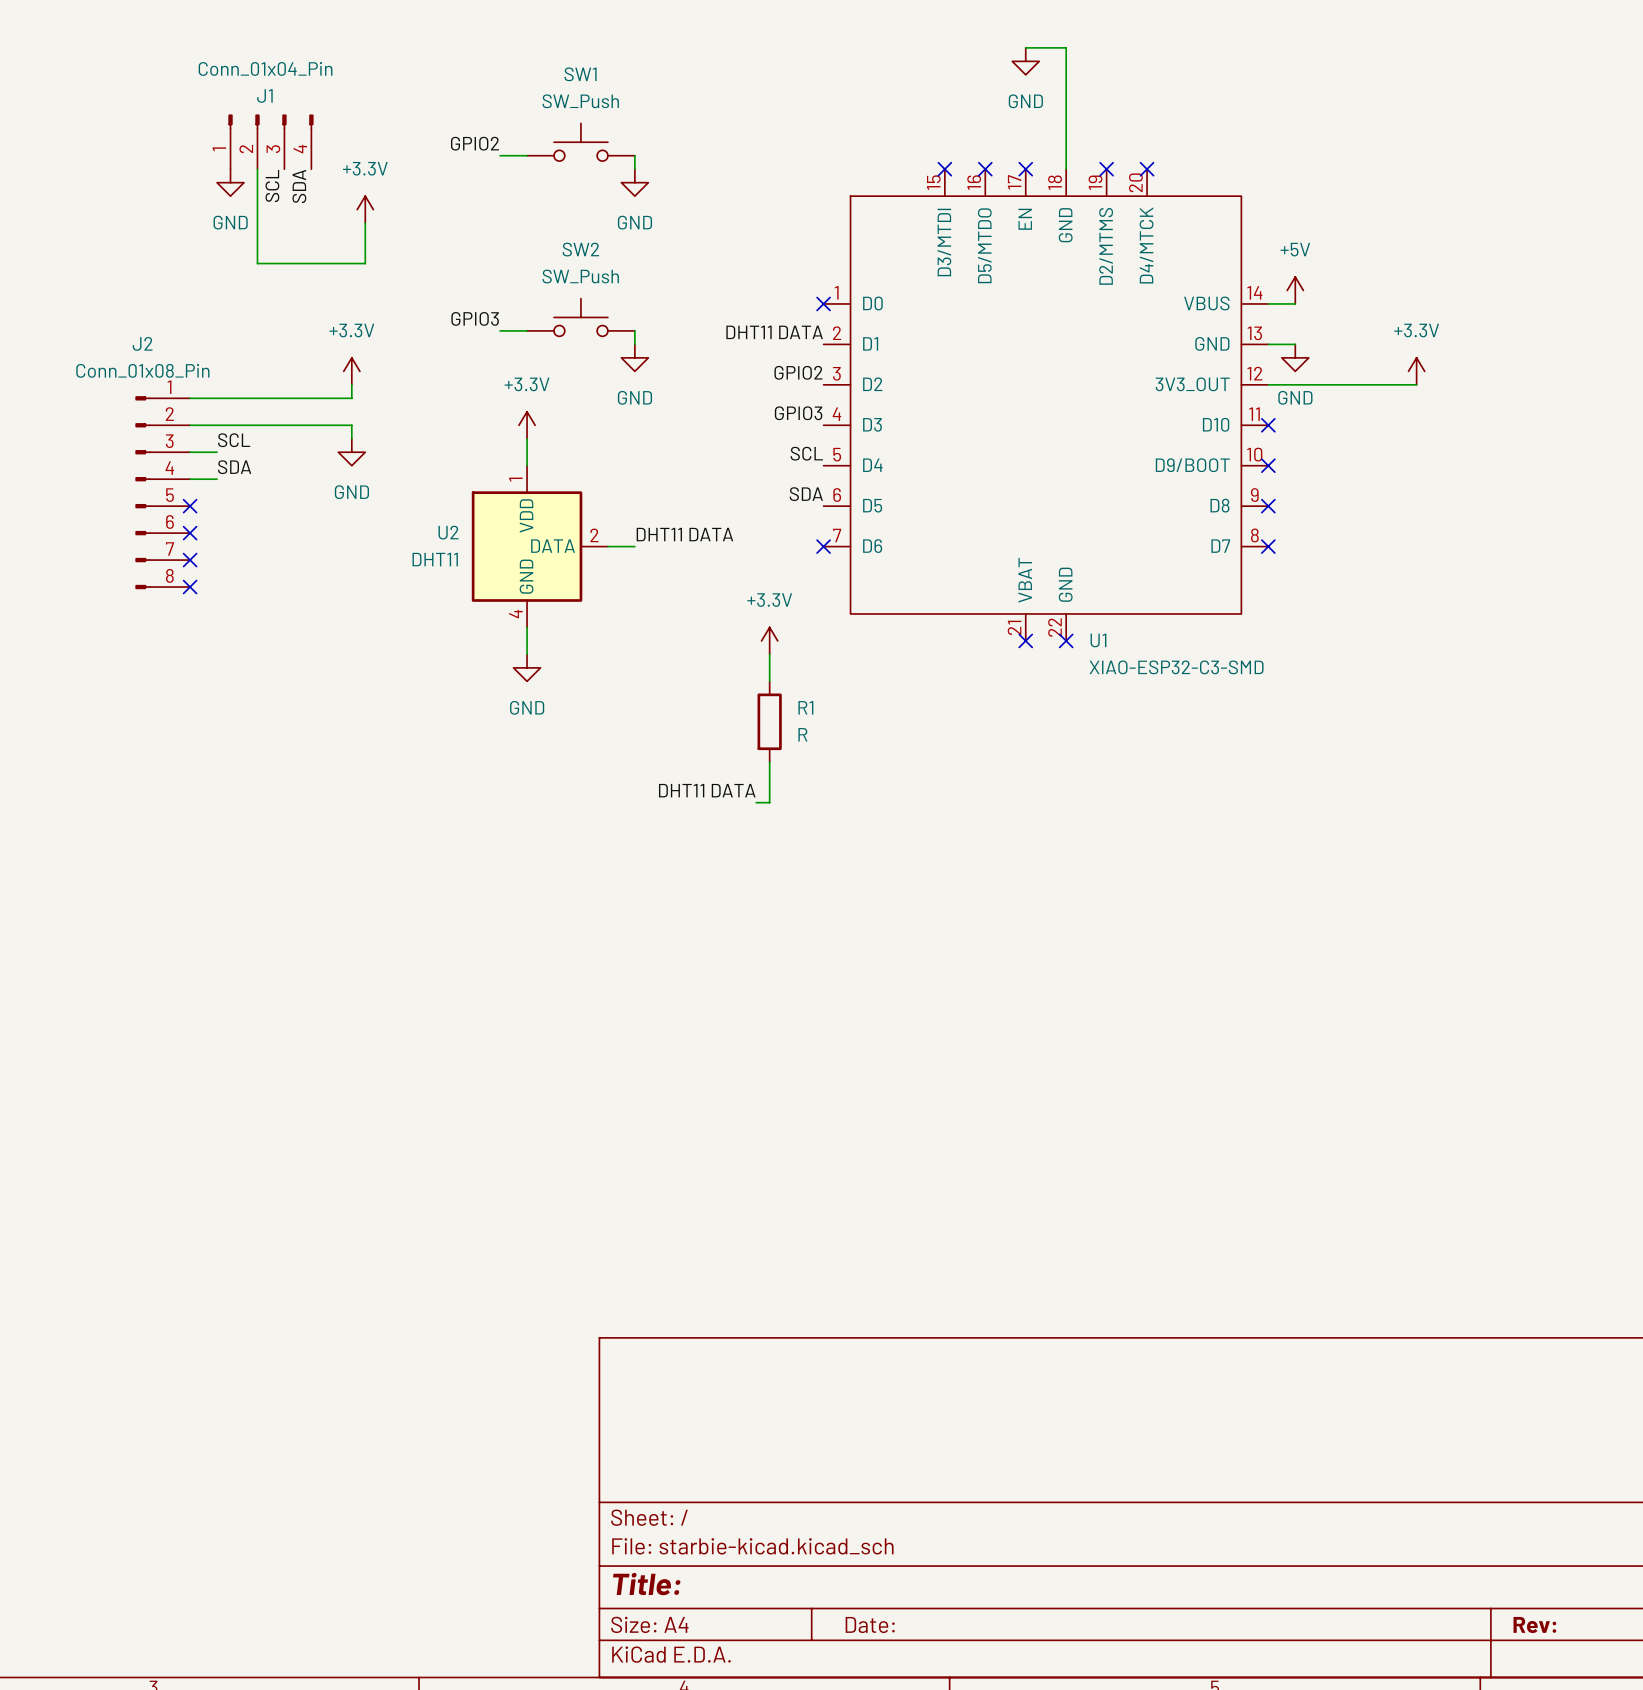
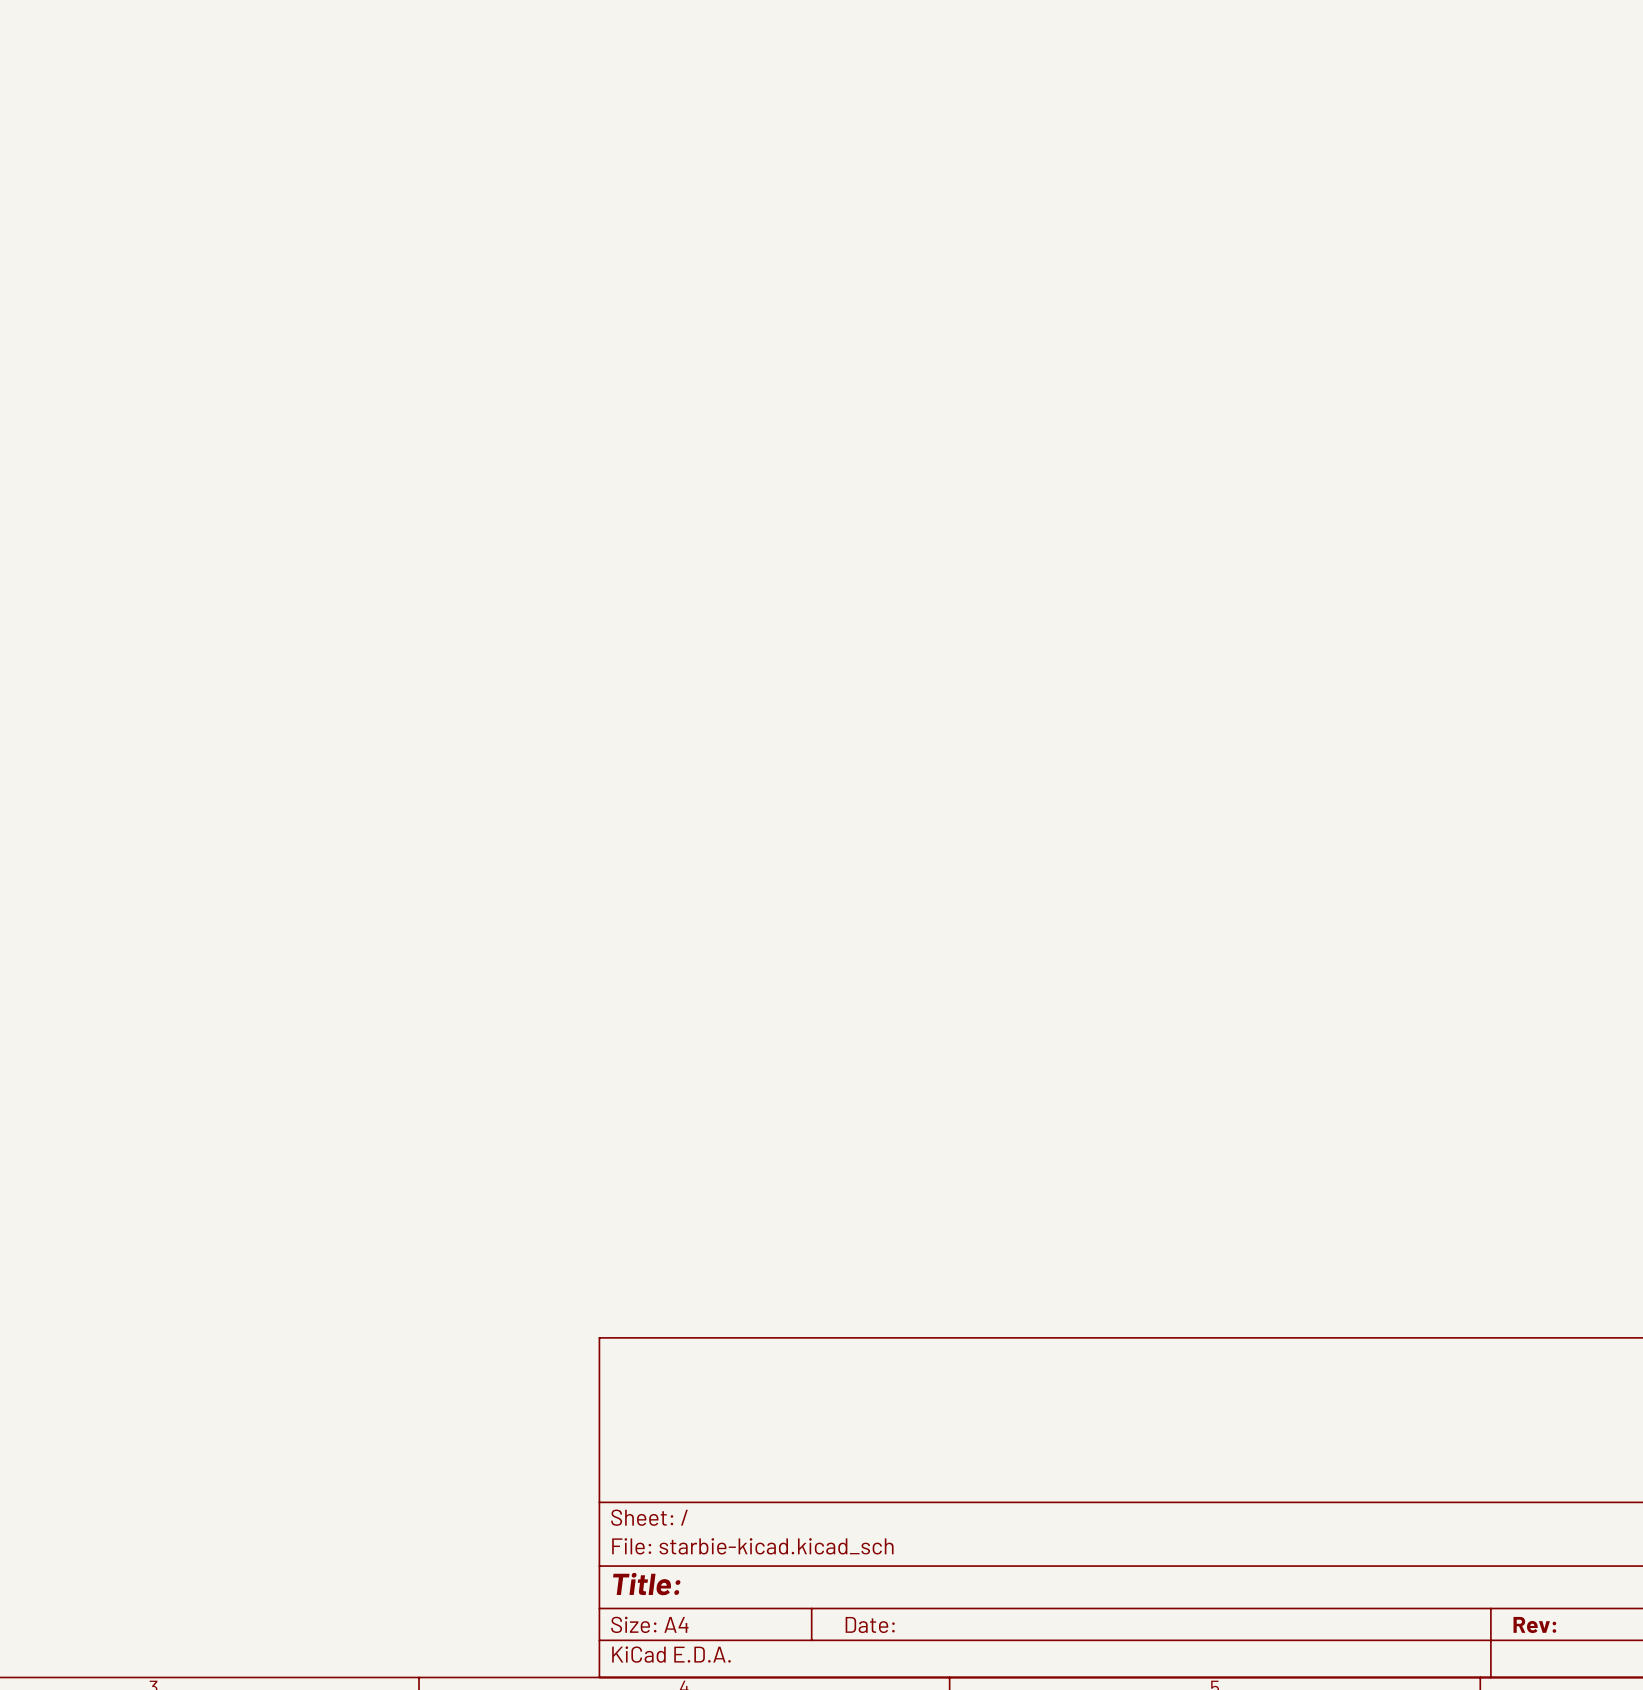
wire: (1025, 47) (1066, 47) (1066, 169) -> none
power symbol: GND (1025, 61) -> none
J1: Conn_01x04_Pin (270, 141) -> none
SW1: SW_Push (580, 142) -> none
label: GPIO2 (474, 143) -> none
wire: (500, 155) (527, 155) -> none
wire: (634, 155) (634, 169) -> none
wire: (257, 169) (257, 263) (365, 263) (365, 223) -> none
no-connect mark: (944, 169) -> none
no-connect mark: (985, 169) -> none
no-connect mark: (1025, 169) -> none
no-connect mark: (1106, 169) -> none
no-connect mark: (1147, 169) -> none
power symbol: GND (230, 182) -> none
power symbol: GND (634, 182) -> none
label: SCL (272, 185) -> none
label: SDA (299, 186) -> none
power symbol: +3.3V (365, 209) -> none
power symbol: +5V (1295, 290) -> none
no-connect mark: (823, 303) -> none
wire: (1268, 303) (1295, 303) -> none
SW2: SW_Push (580, 317) -> none
label: GPIO3 (475, 318) -> none
wire: (500, 330) (527, 330) -> none
wire: (634, 330) (634, 344) -> none
label: DHT11 DATA (774, 332) -> none
wire: (1268, 344) (1295, 344) -> none
power symbol: GND (634, 357) -> none
power symbol: GND (1295, 357) -> none
power symbol: +3.3V (351, 371) -> none
power symbol: +3.3V (1416, 371) -> none
label: GPIO2 (798, 372) -> none
wire: (351, 384) (351, 398) (190, 398) -> none
wire: (1268, 384) (1416, 384) -> none
U1: XIAO-ESP32-C3-SMD (1045, 405) -> none
label: GPIO3 (798, 413) -> none
wire: (190, 425) (351, 425) (351, 438) -> none
power symbol: +3.3V (527, 425) -> none
no-connect mark: (1268, 425) -> none
wire: (527, 438) (527, 465) -> none
label: SCL (234, 440) -> none
wire: (190, 452) (217, 452) -> none
power symbol: GND (351, 452) -> none
label: SCL (806, 453) -> none
no-connect mark: (1268, 465) -> none
label: SDA (234, 467) -> none
wire: (190, 479) (217, 479) -> none
J2: Conn_01x08_Pin (162, 492) -> none
label: SDA (806, 494) -> none
no-connect mark: (190, 506) -> none
no-connect mark: (1268, 506) -> none
no-connect mark: (190, 533) -> none
label: DHT11 DATA (684, 534) -> none
U2: DHT11 (539, 546) -> none
wire: (607, 546) (634, 546) -> none
no-connect mark: (823, 546) -> none
no-connect mark: (1268, 546) -> none
no-connect mark: (190, 560) -> none
no-connect mark: (190, 587) -> none
wire: (527, 627) (527, 654) -> none
power symbol: +3.3V (769, 640) -> none
no-connect mark: (1025, 640) -> none
no-connect mark: (1066, 640) -> none
wire: (769, 654) (769, 681) -> none
power symbol: GND (527, 667) -> none
R1: R (769, 721) -> none
wire: (769, 762) (769, 802) (756, 802) -> none
label: DHT11 DATA (707, 790) -> none

